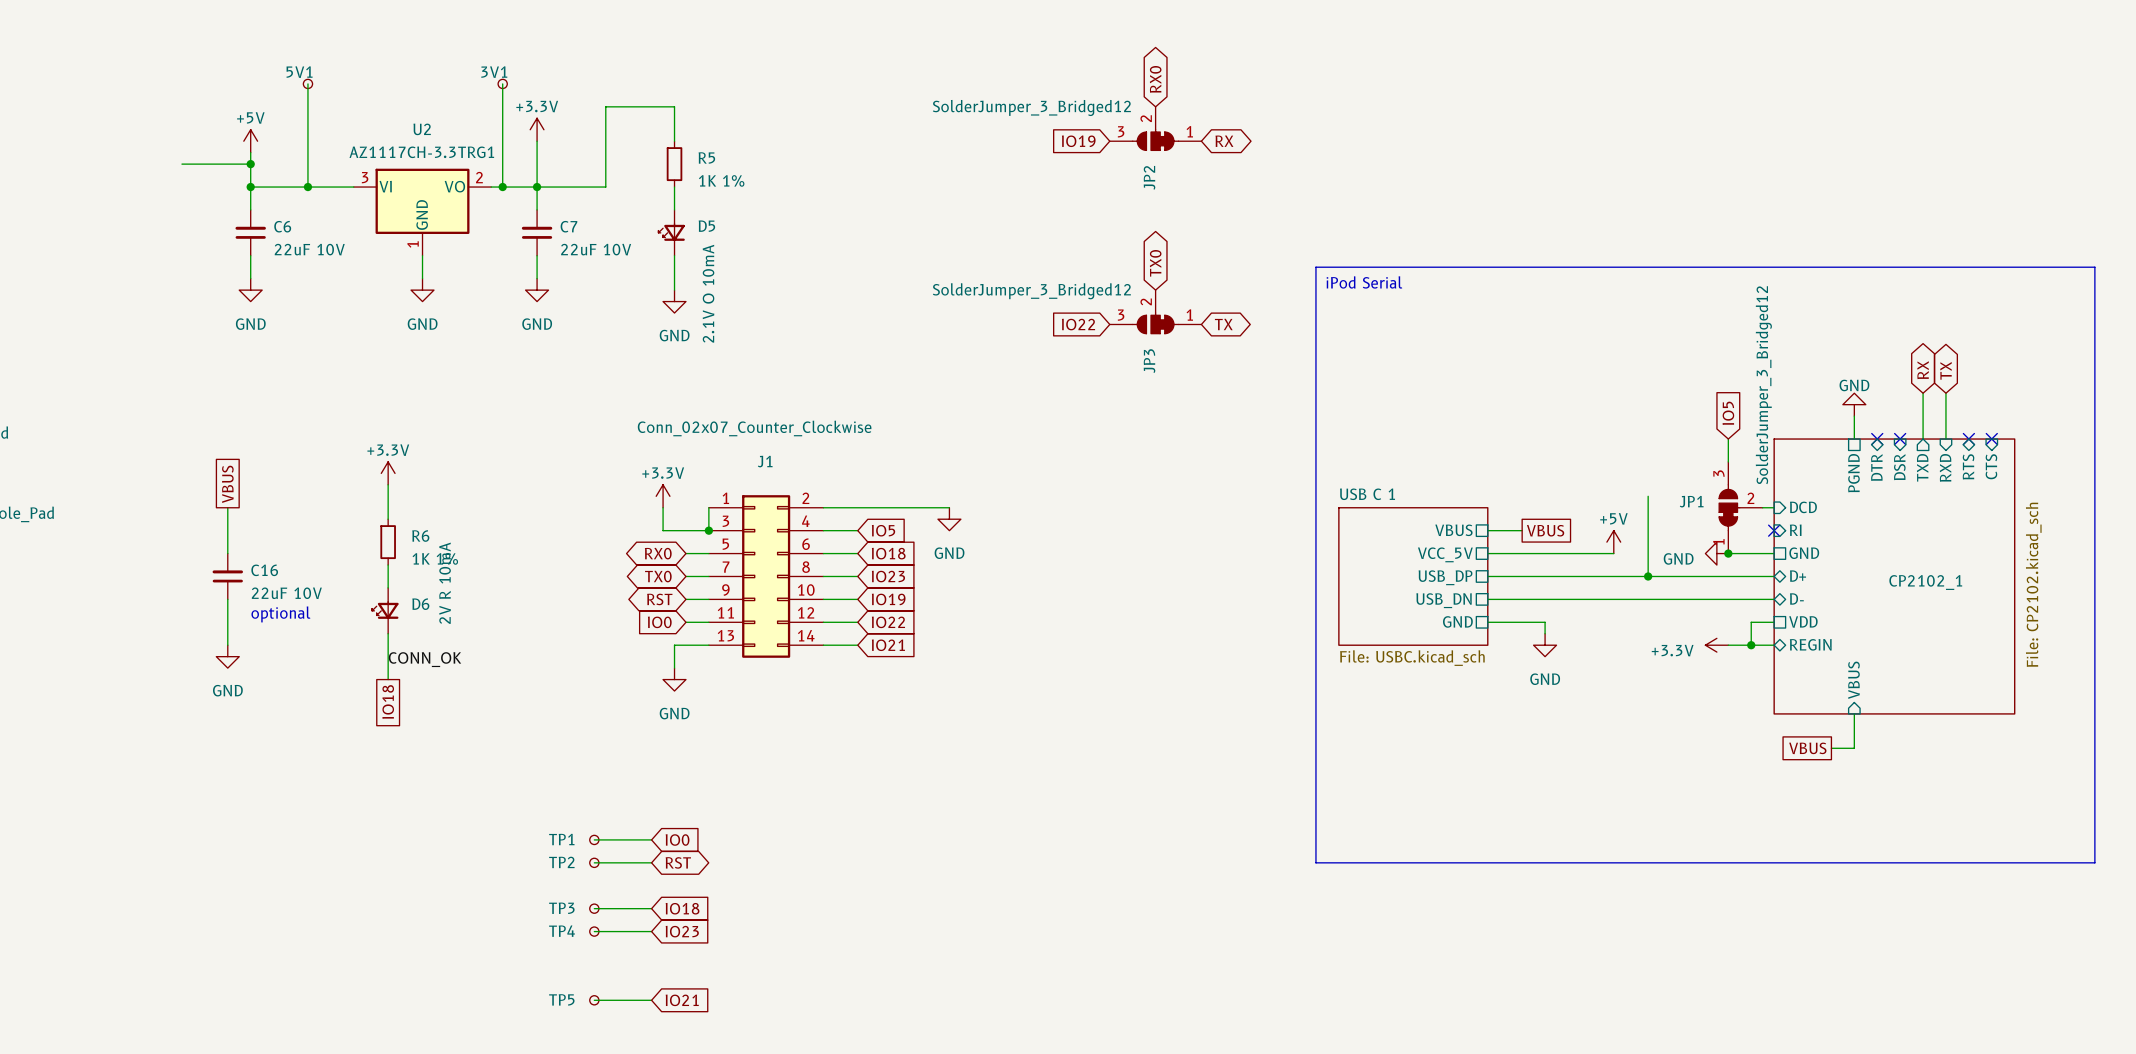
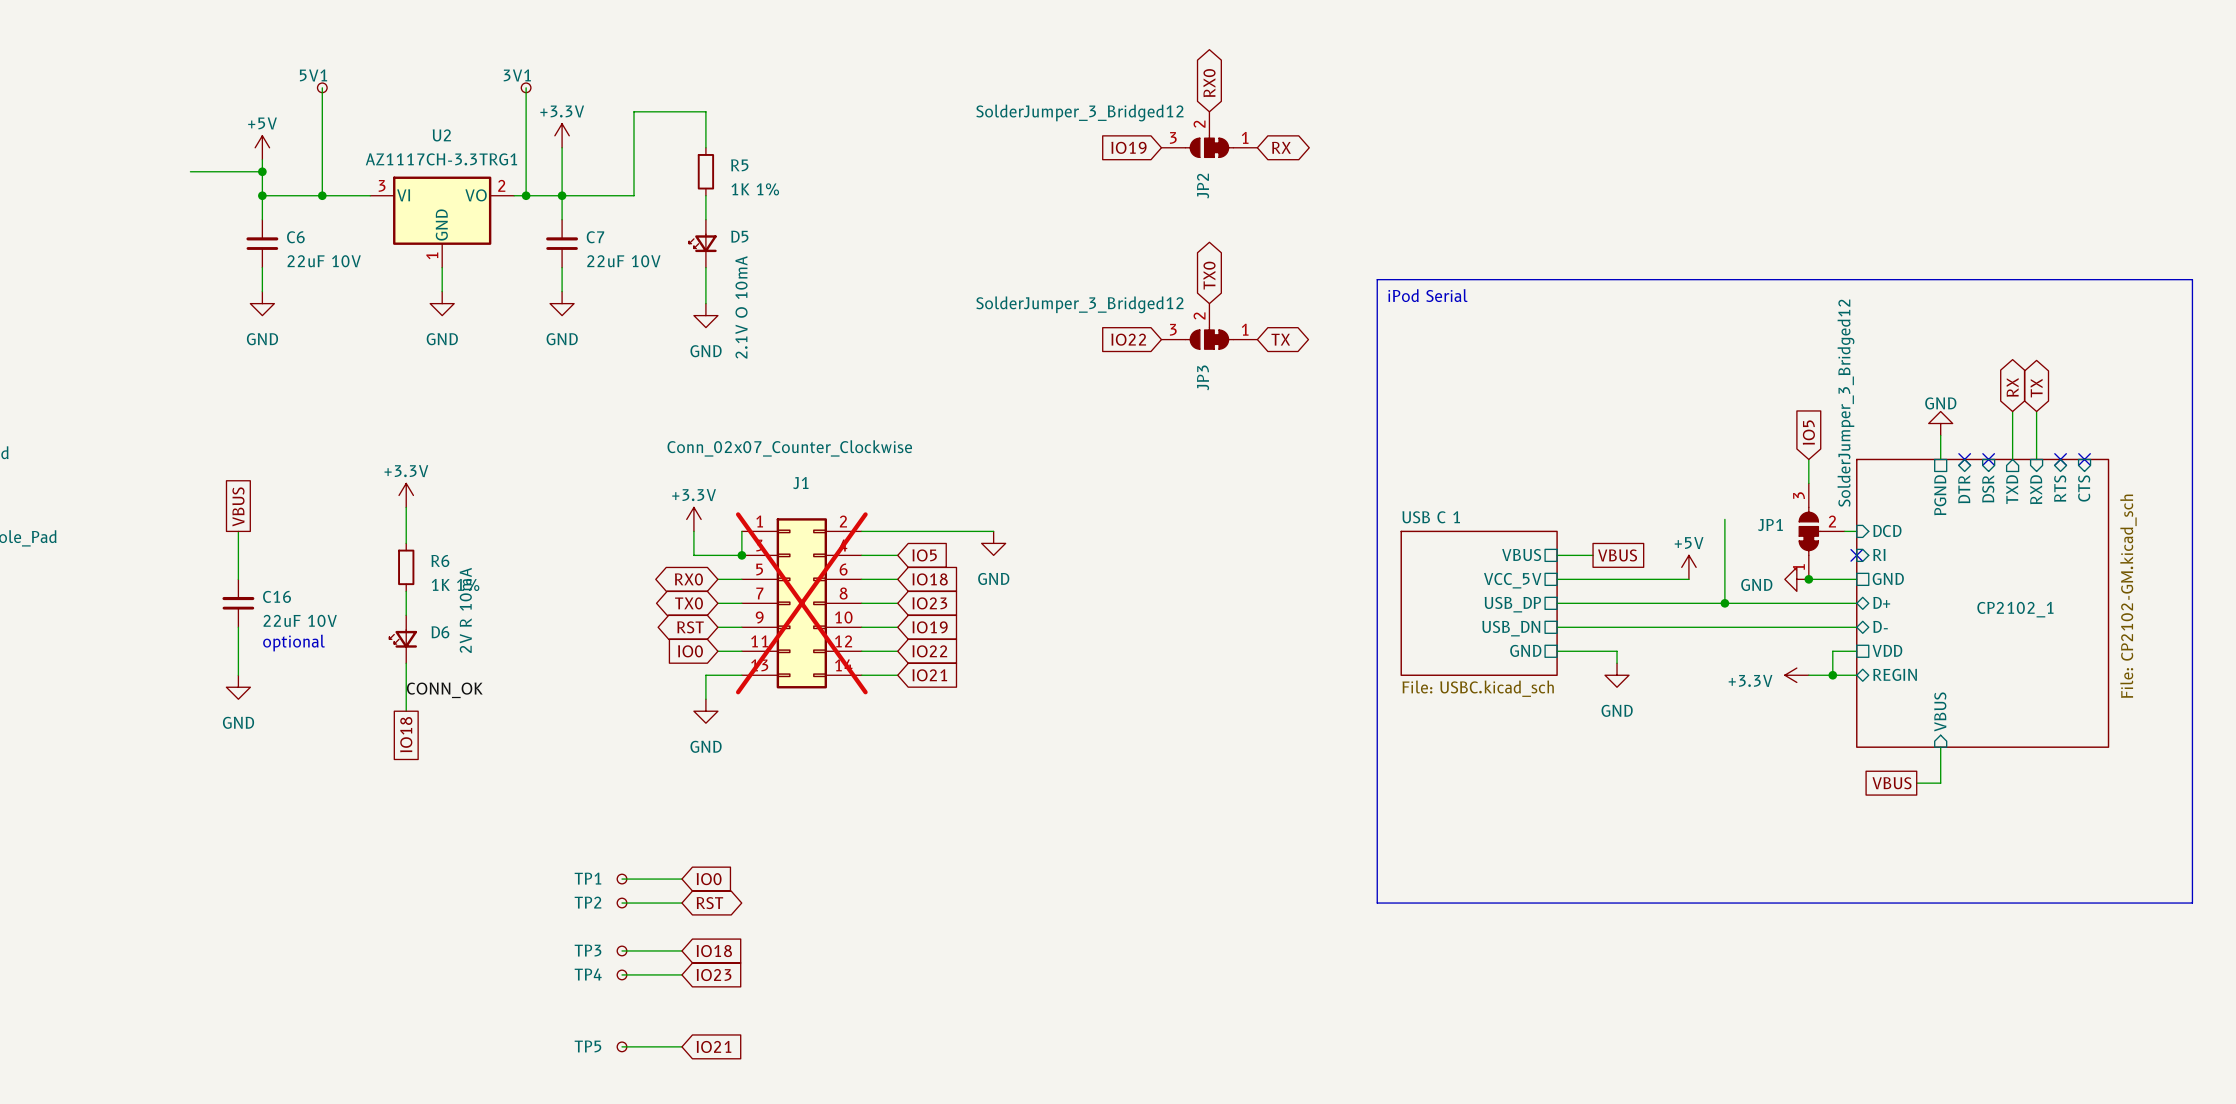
J1 do-not-place cross: none -> (801, 603)
sheet CP2102_1 value: File: CP2102.kicad_sch (2033, 584) -> File: CP2102-GM.kicad_sch (2128, 596)

